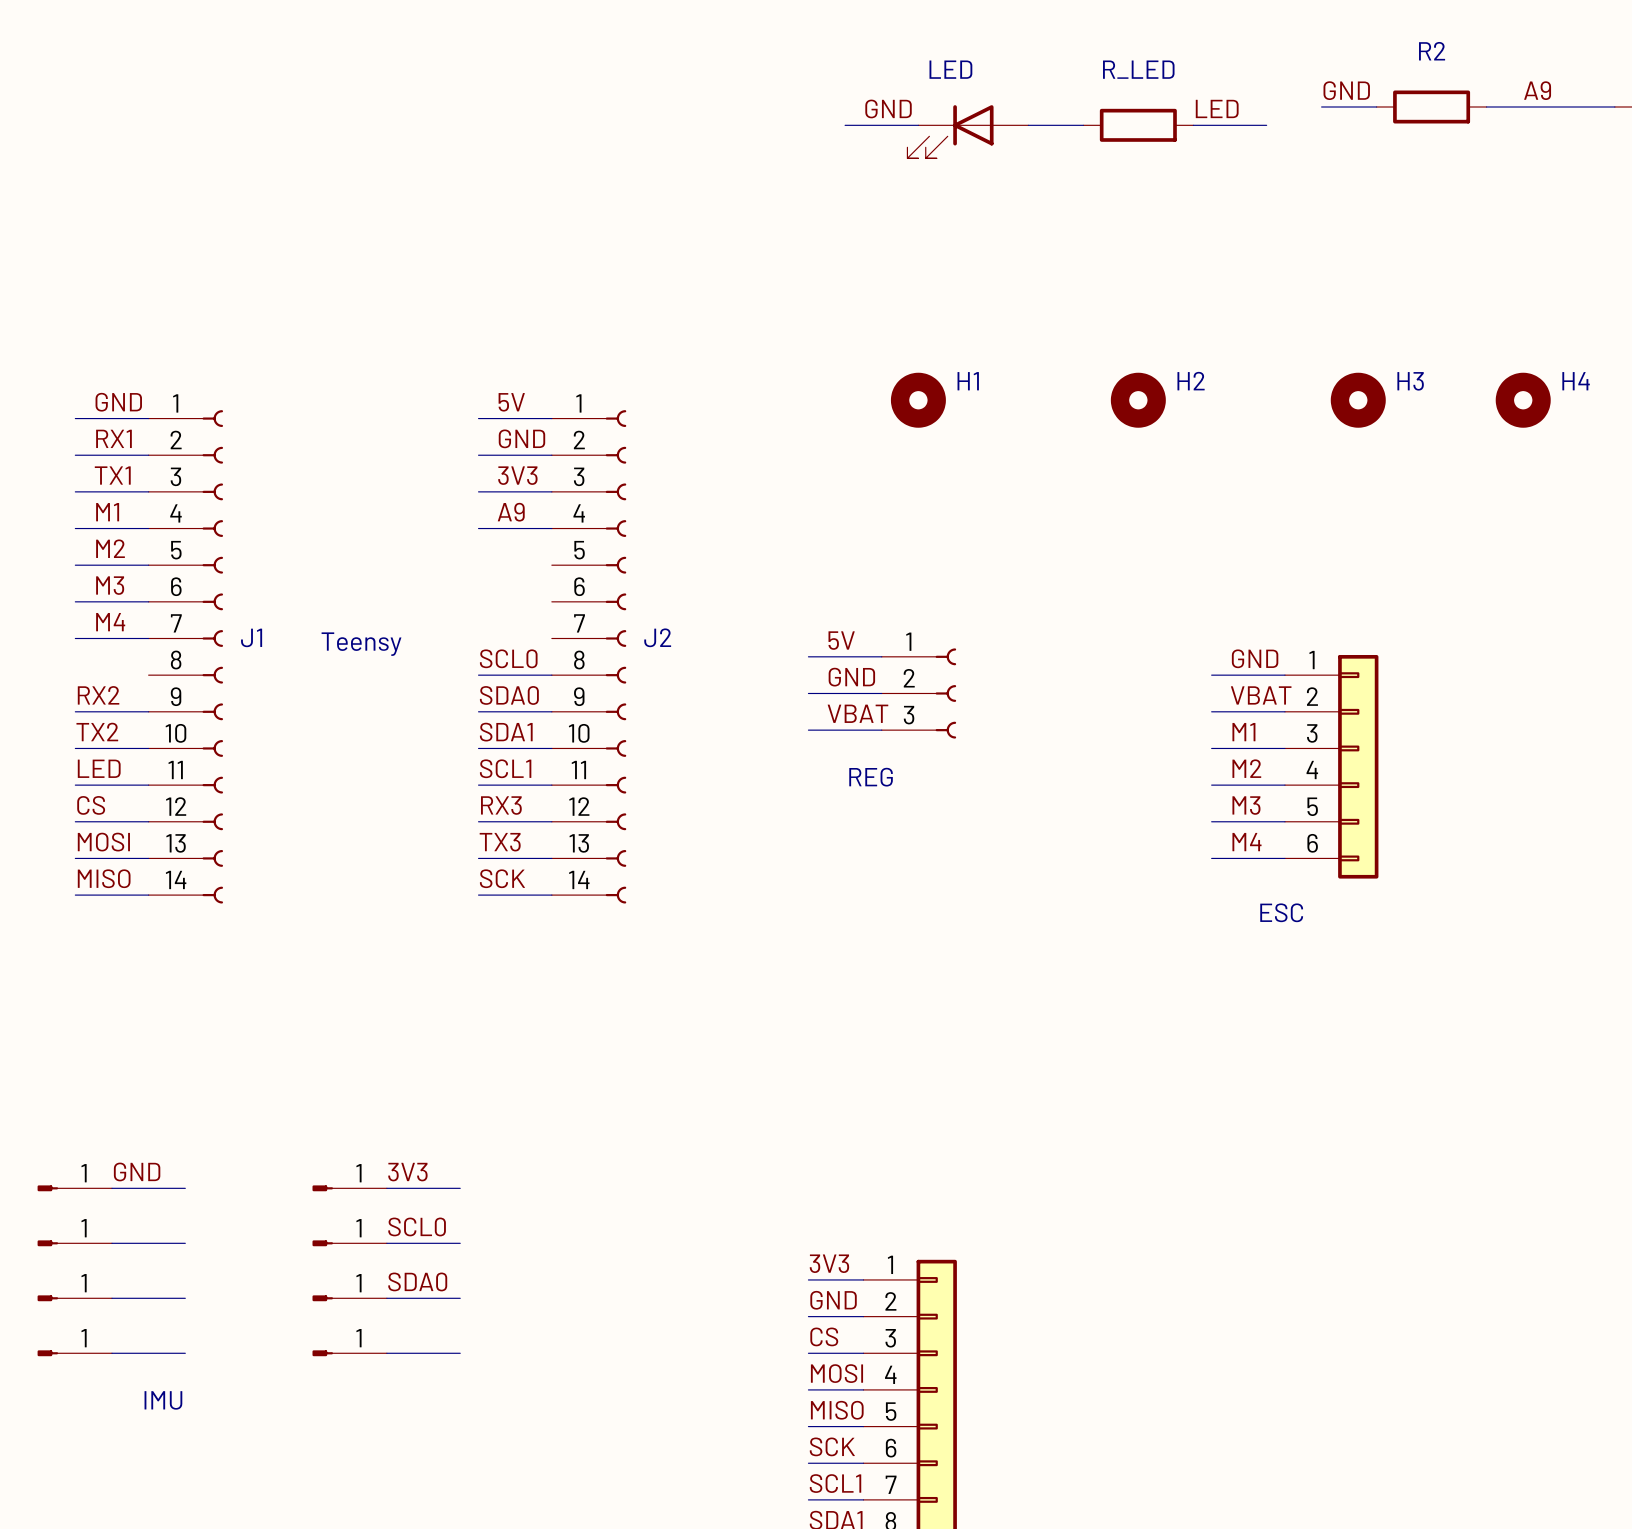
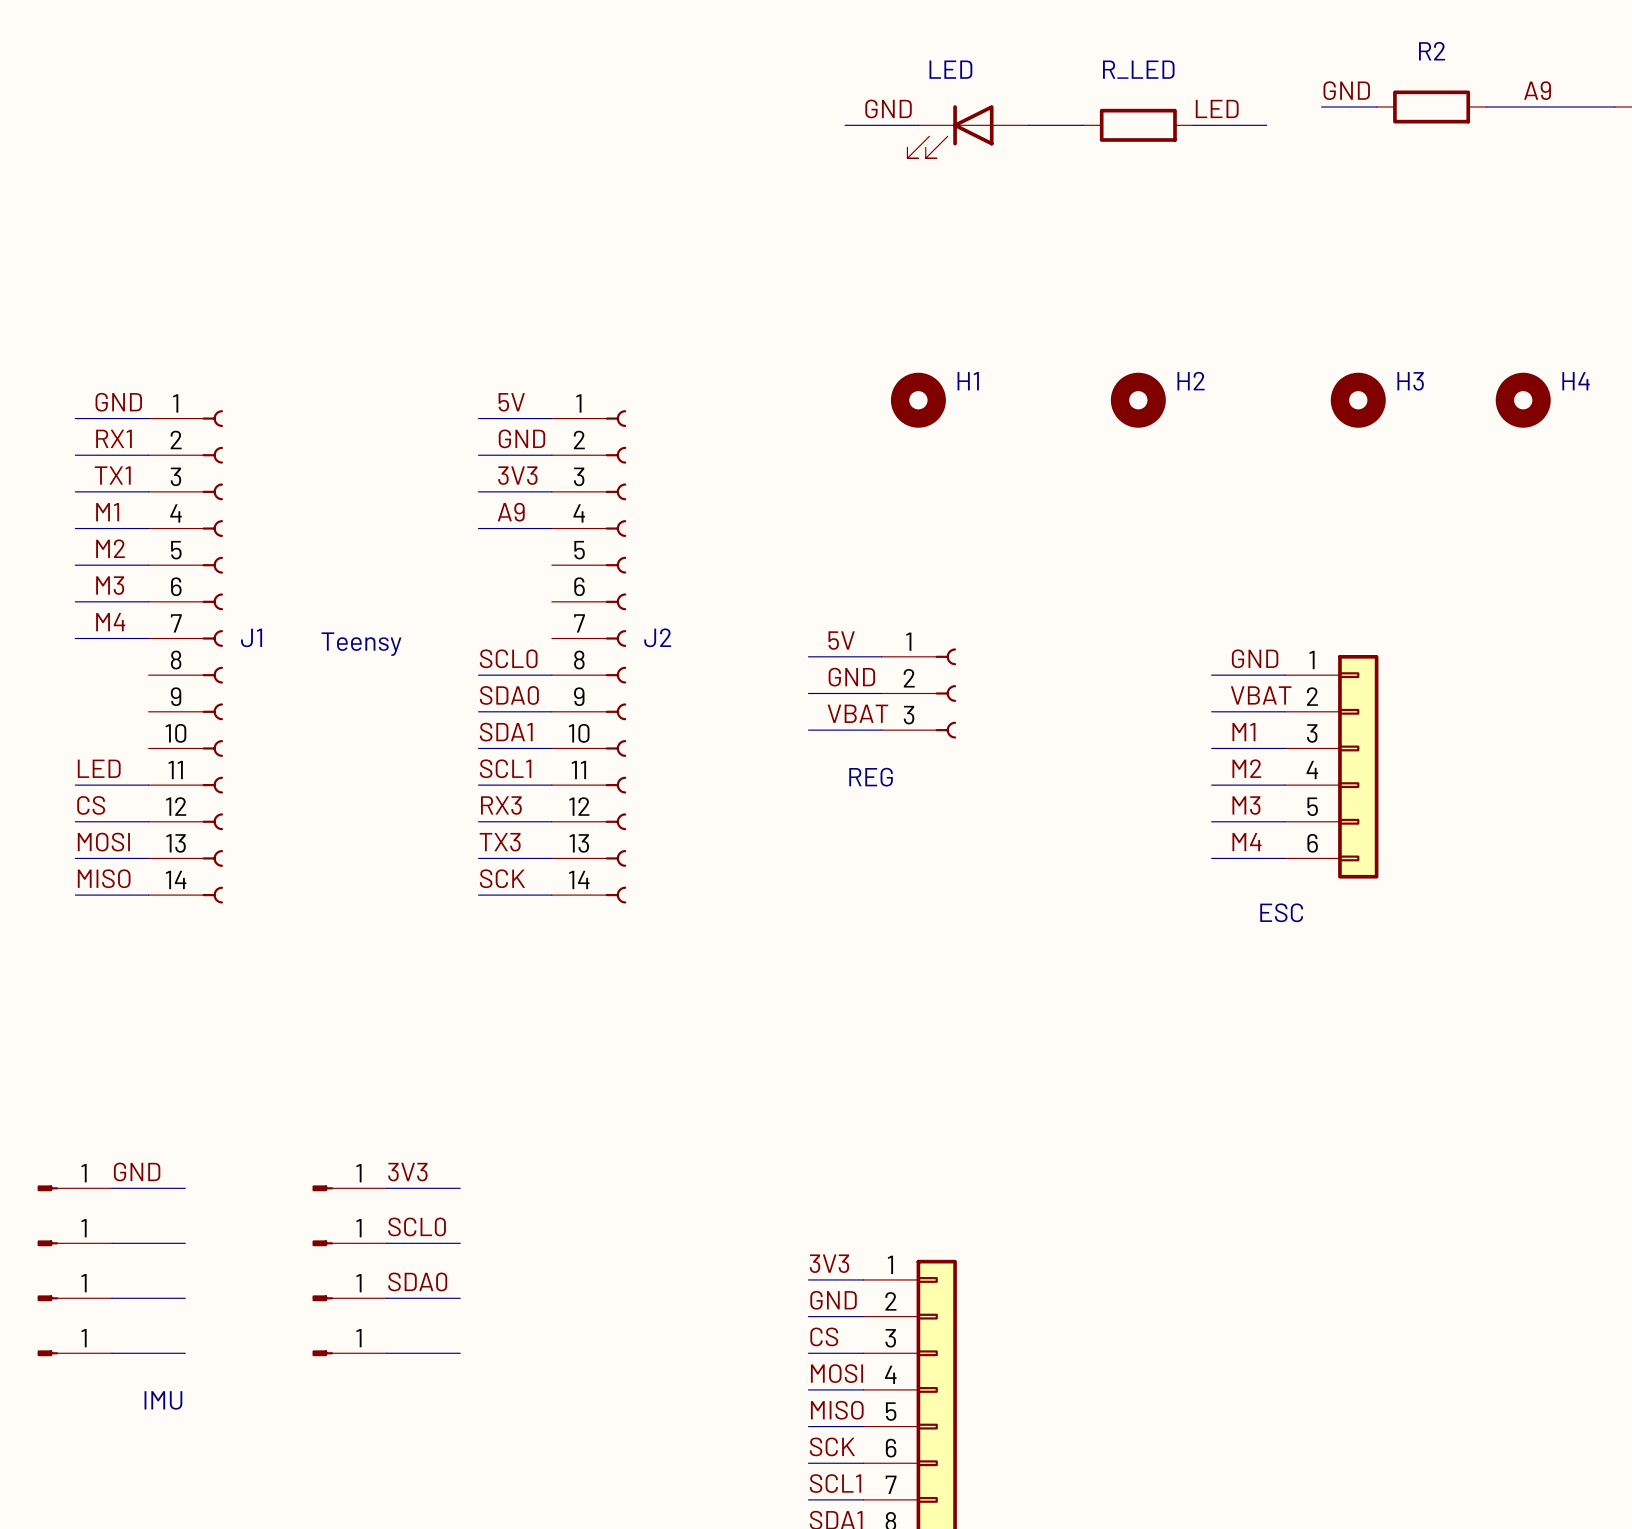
label: RX2 (98, 695) -> none
wire: (75, 711) (148, 711) -> none
label: TX2 (97, 732) -> none
wire: (75, 748) (148, 748) -> none

